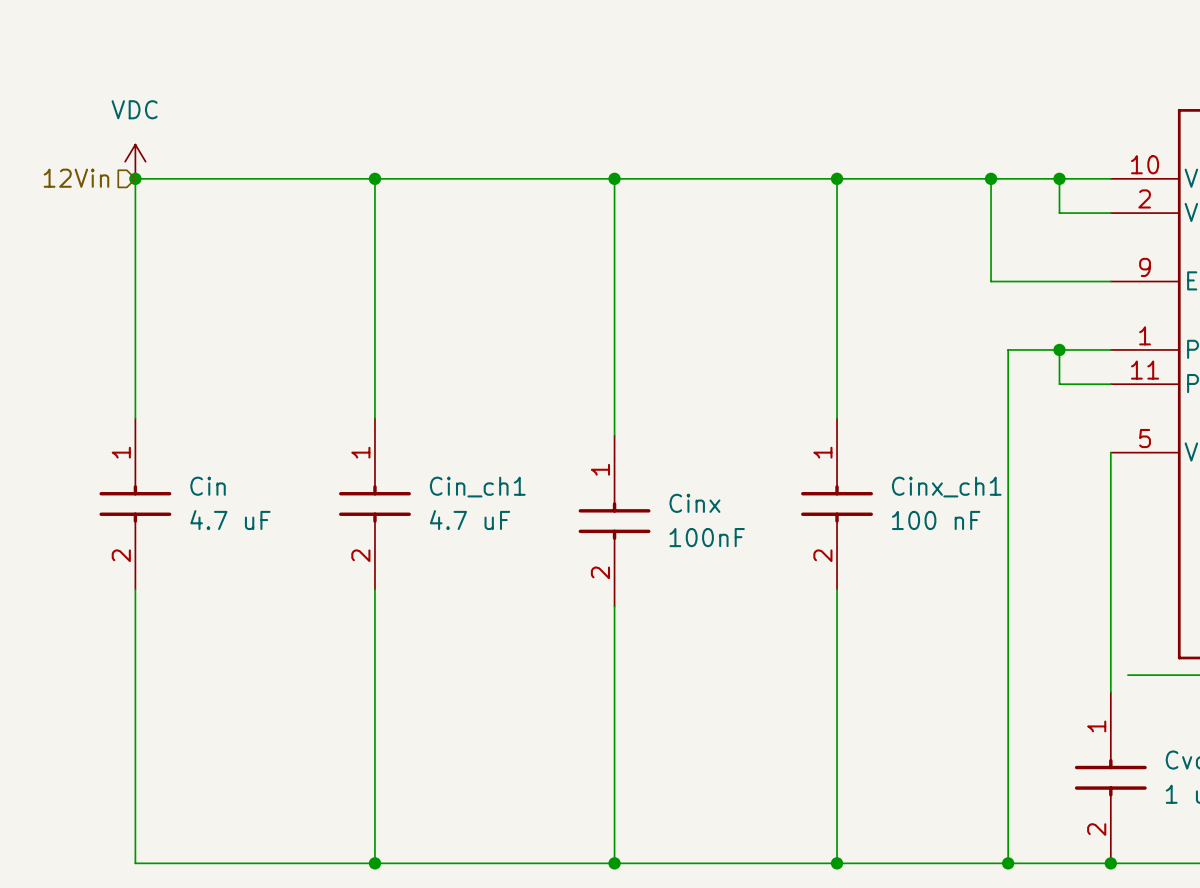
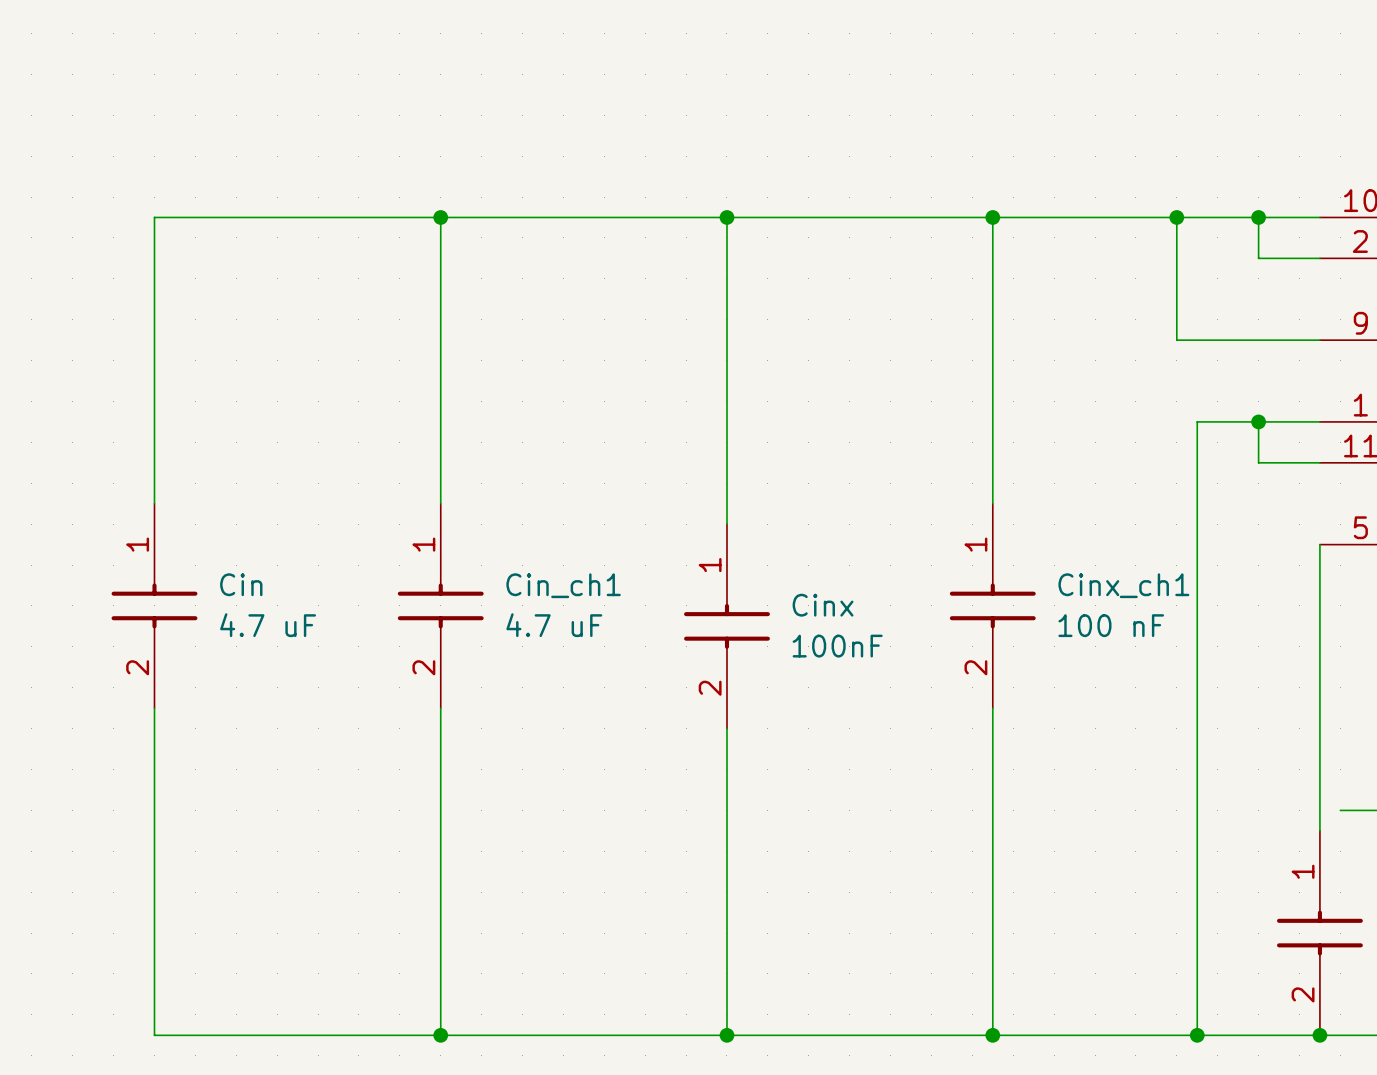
power symbol: VDC (135, 161) -> none
hierarchical label: 12Vin (76, 178) -> none
junction: (135, 178) -> none

